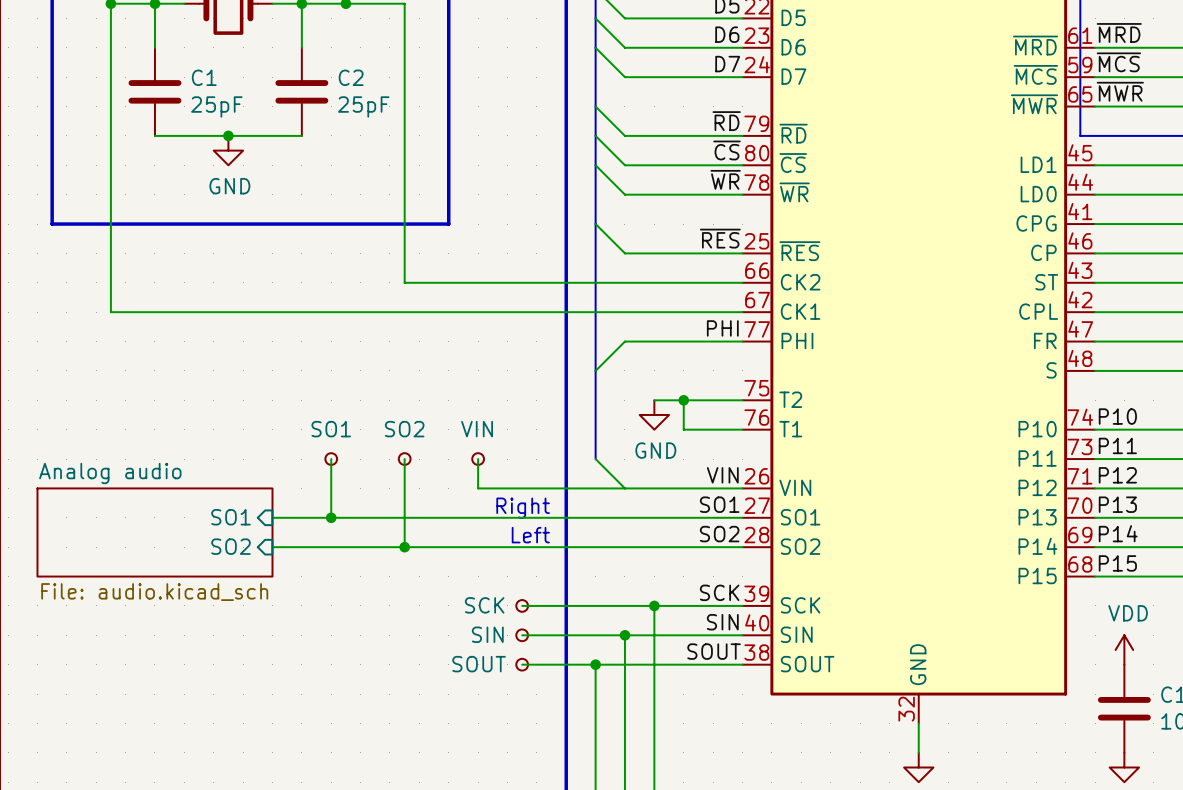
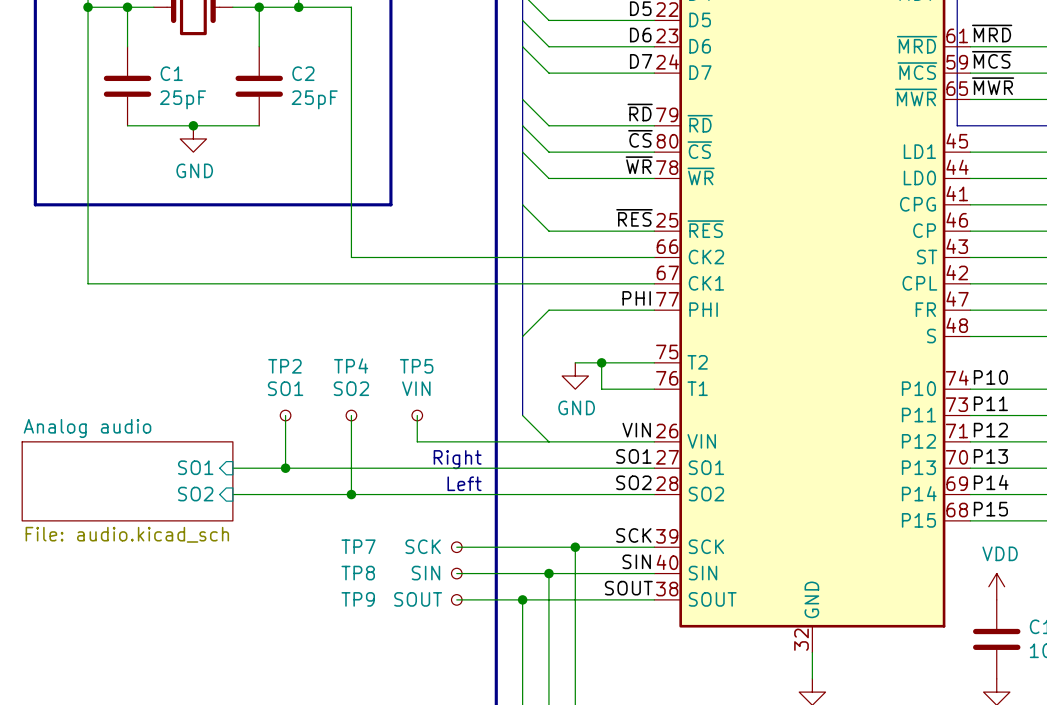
TP4 name: none -> TP4 (351, 365)
TP2 name: none -> TP2 (284, 366)
TP5 name: none -> TP5 (416, 366)
TP7 name: none -> TP7 (358, 546)
TP8 name: none -> TP8 (358, 573)
TP9 name: none -> TP9 (358, 599)

